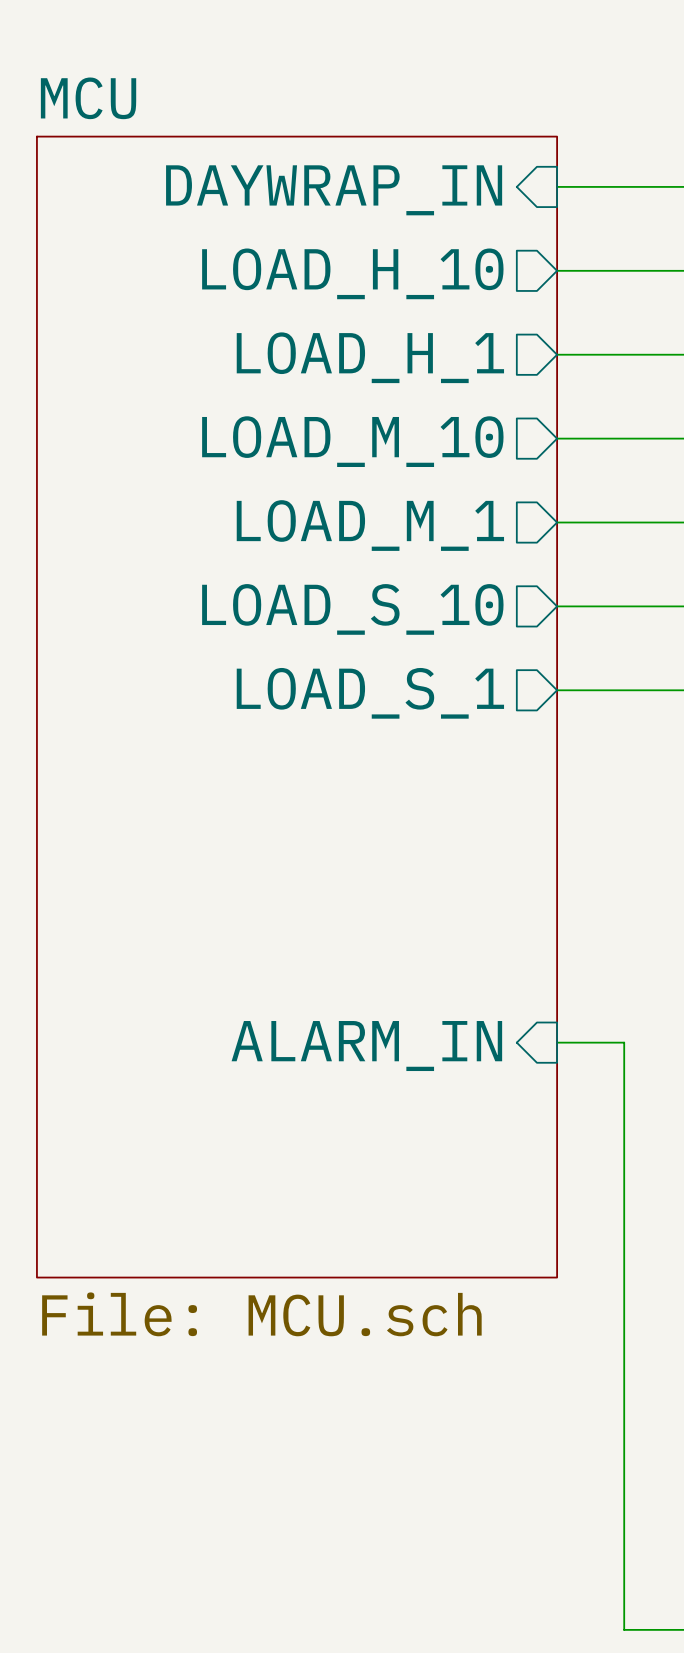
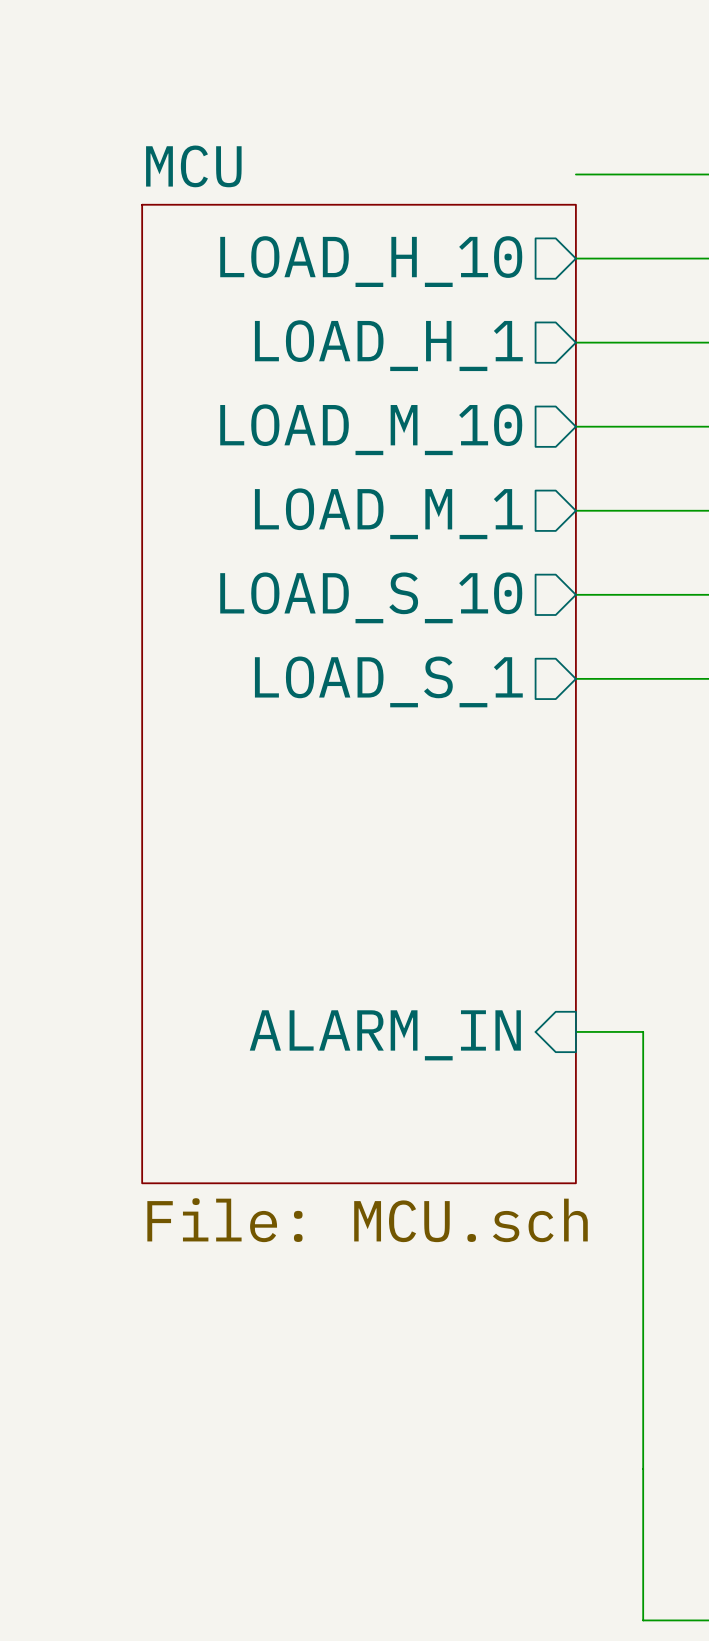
sheet pin: DAYWRAP_IN (334, 190) -> none
sheet MCU: none -> File: MCU.sch (359, 694)
sheet MCU: File: MCU.sch (297, 707) -> none

